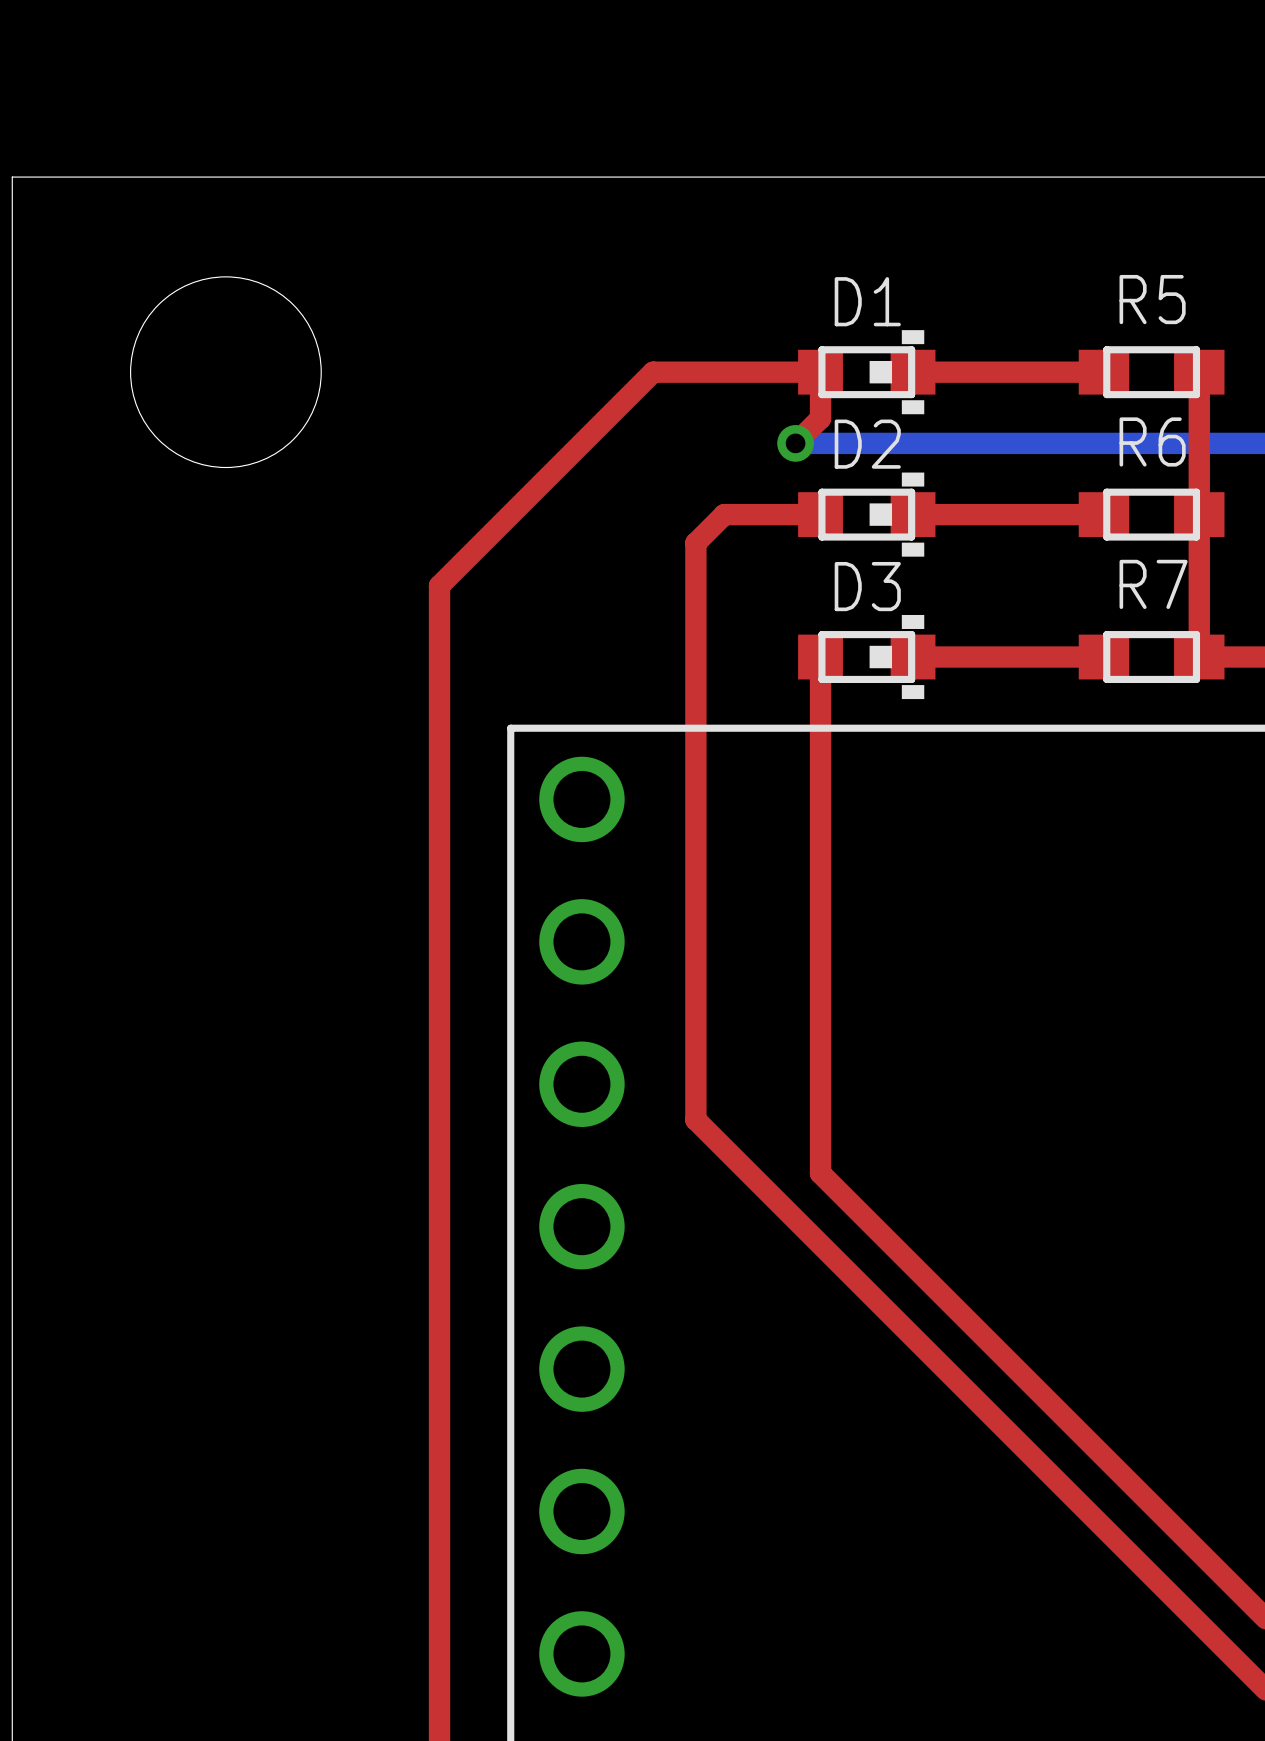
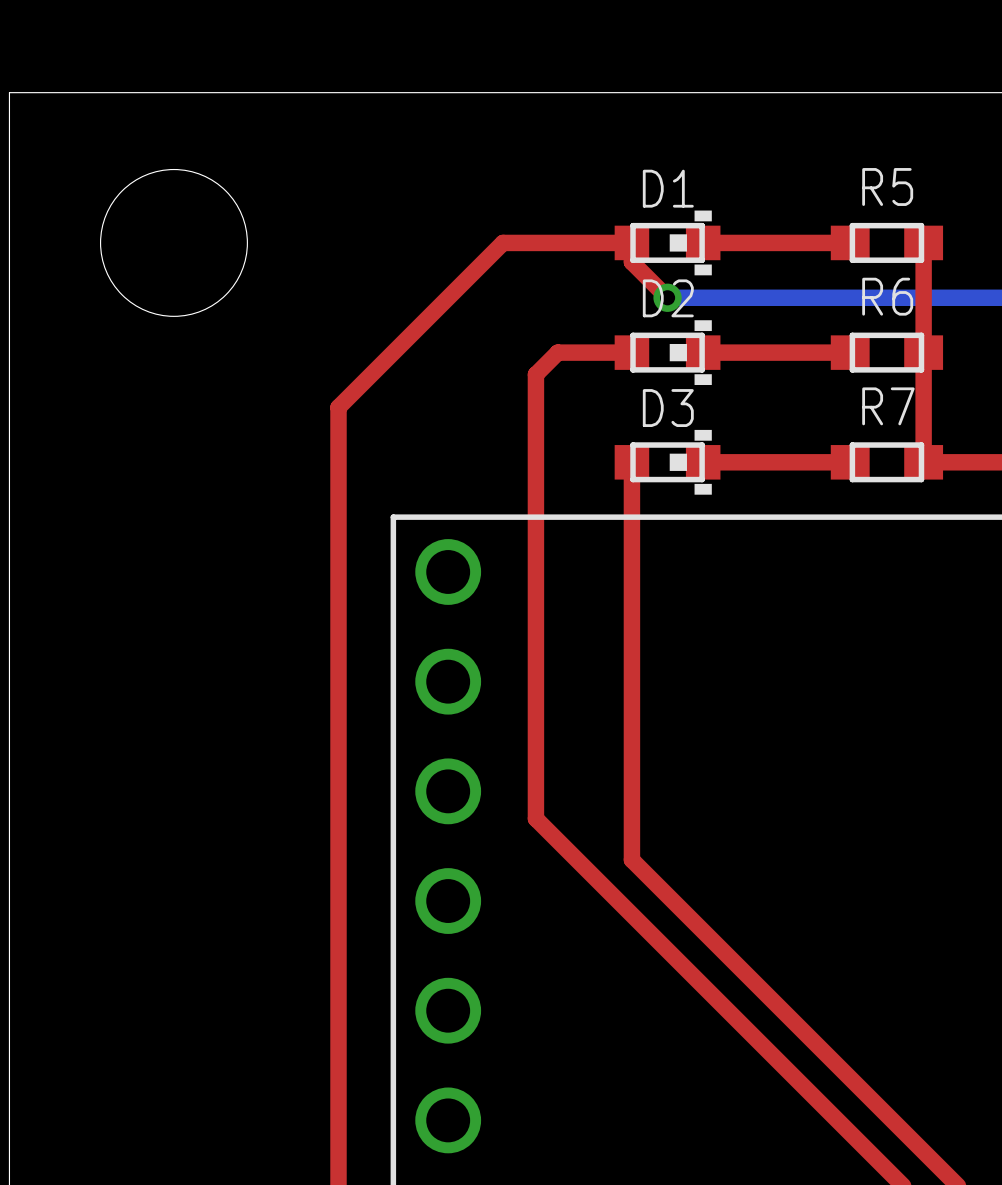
top track: (820, 397) (820, 418) (795, 443) -> (631, 262) (667, 297)
bottom track: (795, 443) (866, 443) -> none
via position: (795, 443) -> (667, 297)

